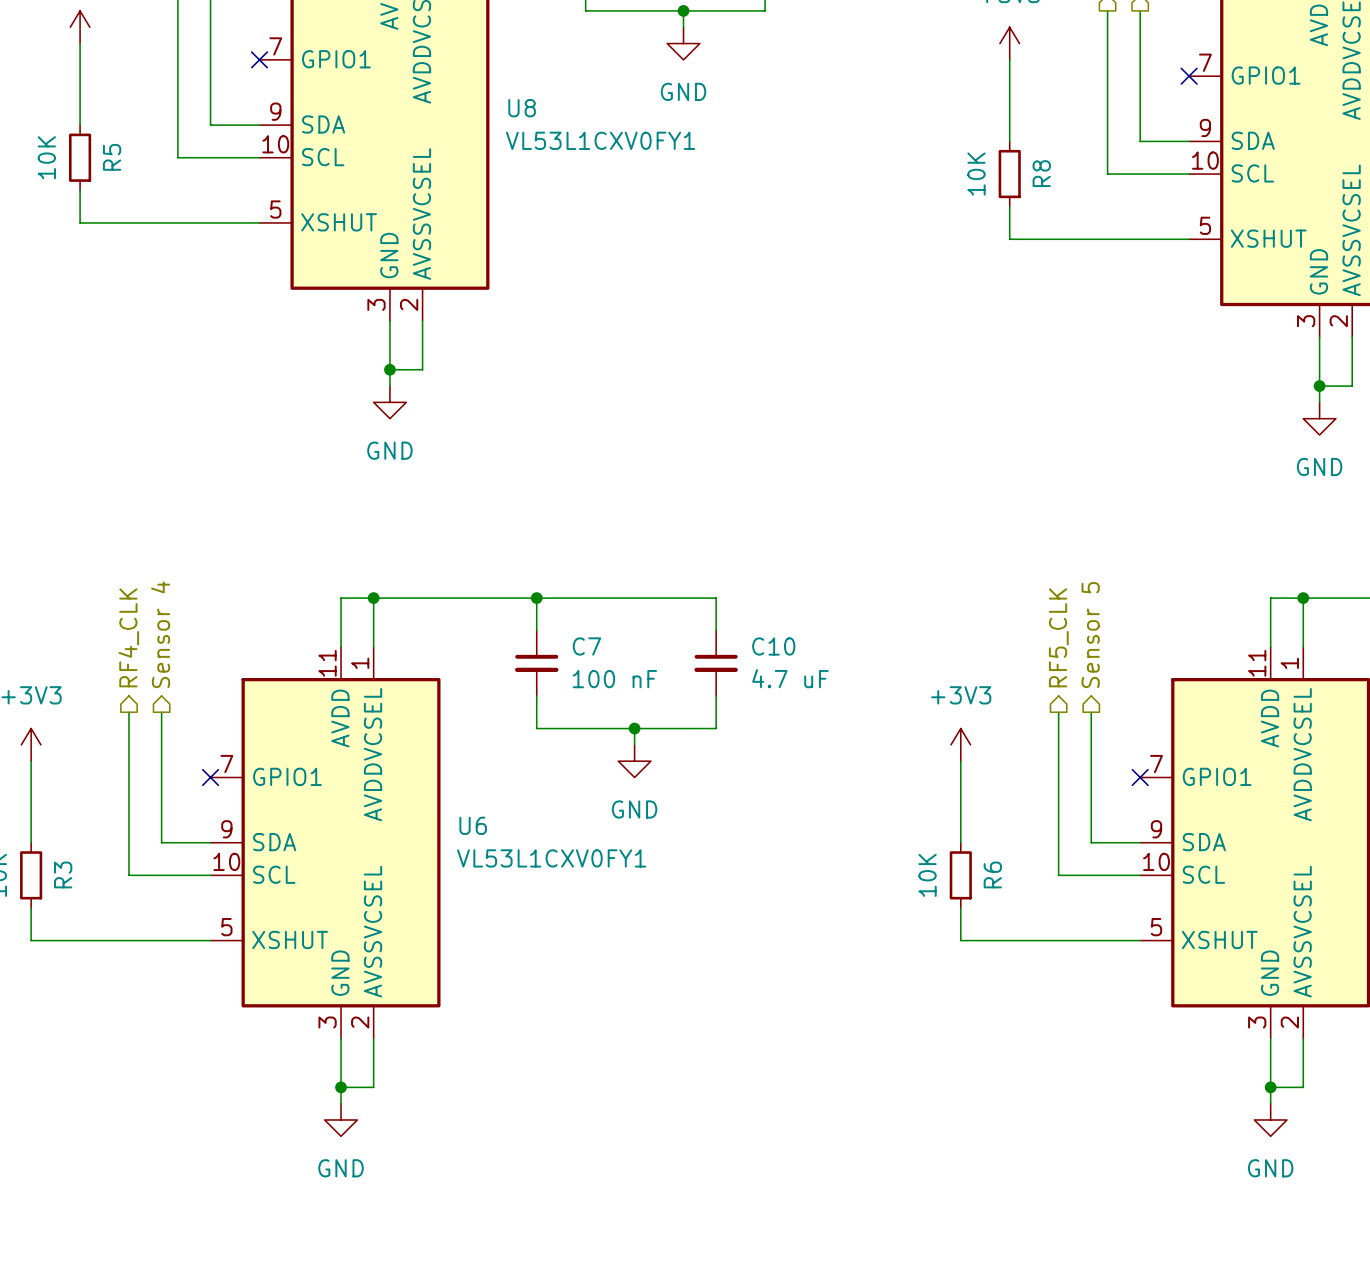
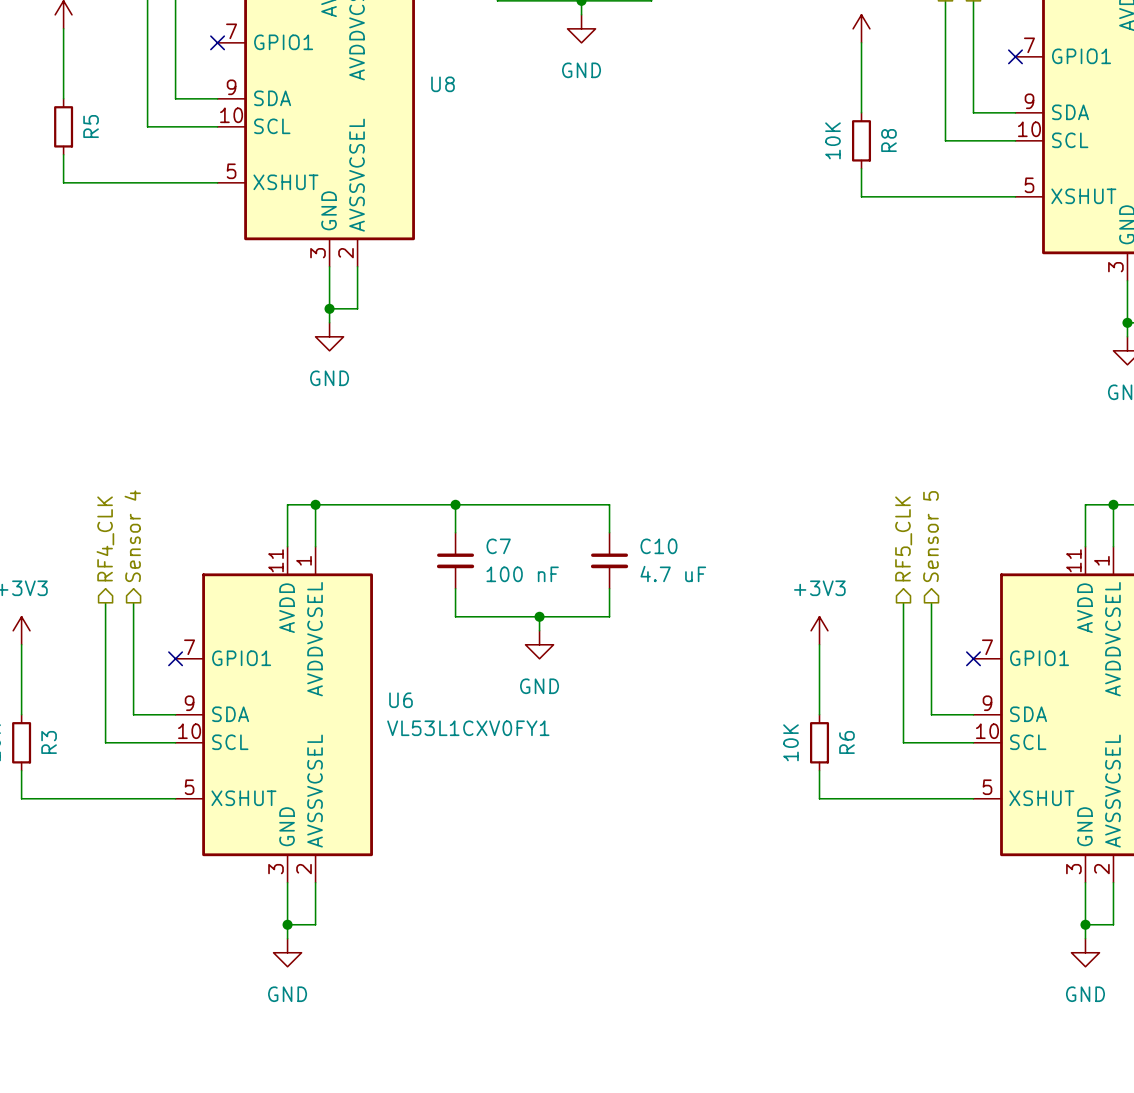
U8 value: VL53L1CXV0FY1 (600, 140) -> none
R5 value: 10K (46, 157) -> none

